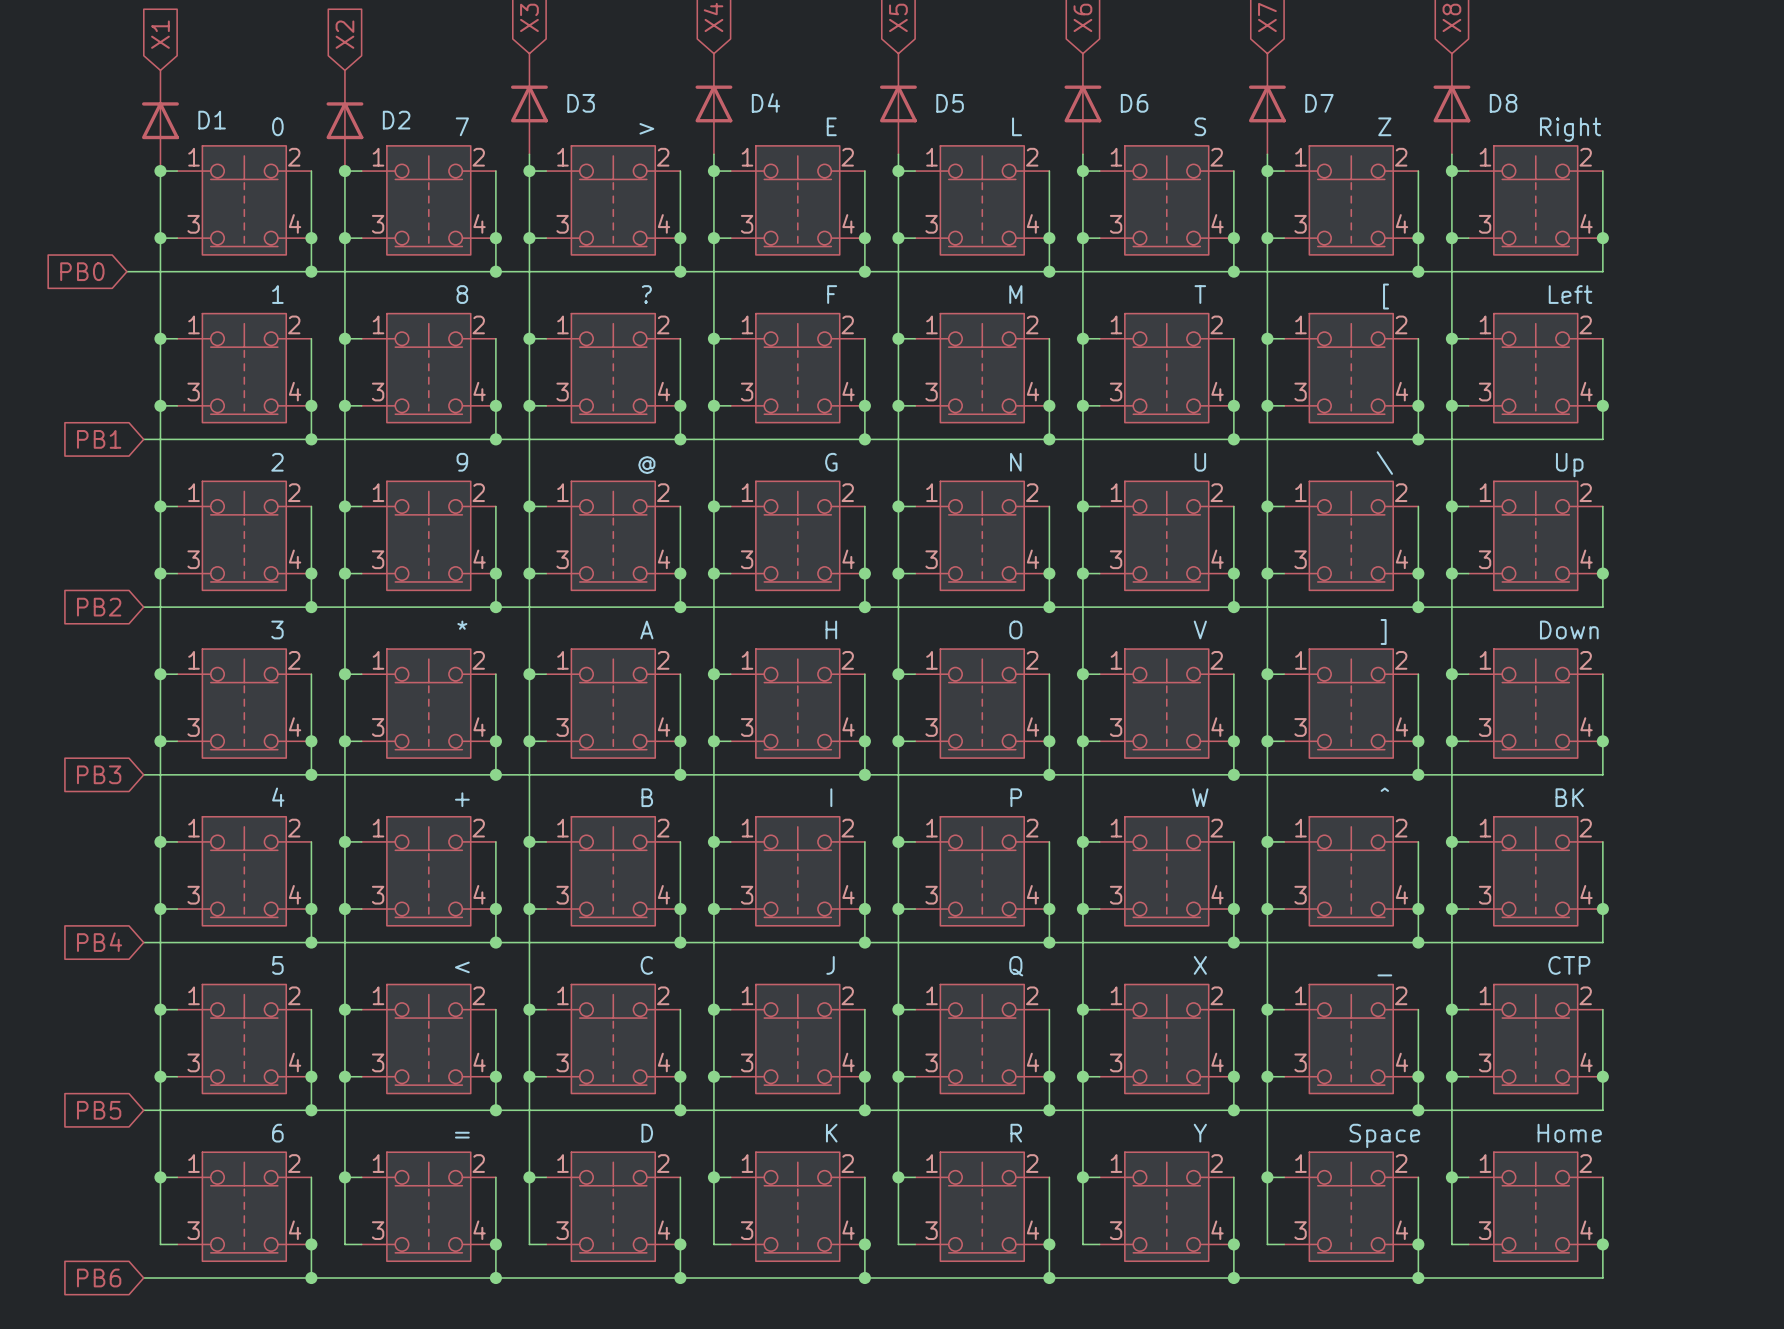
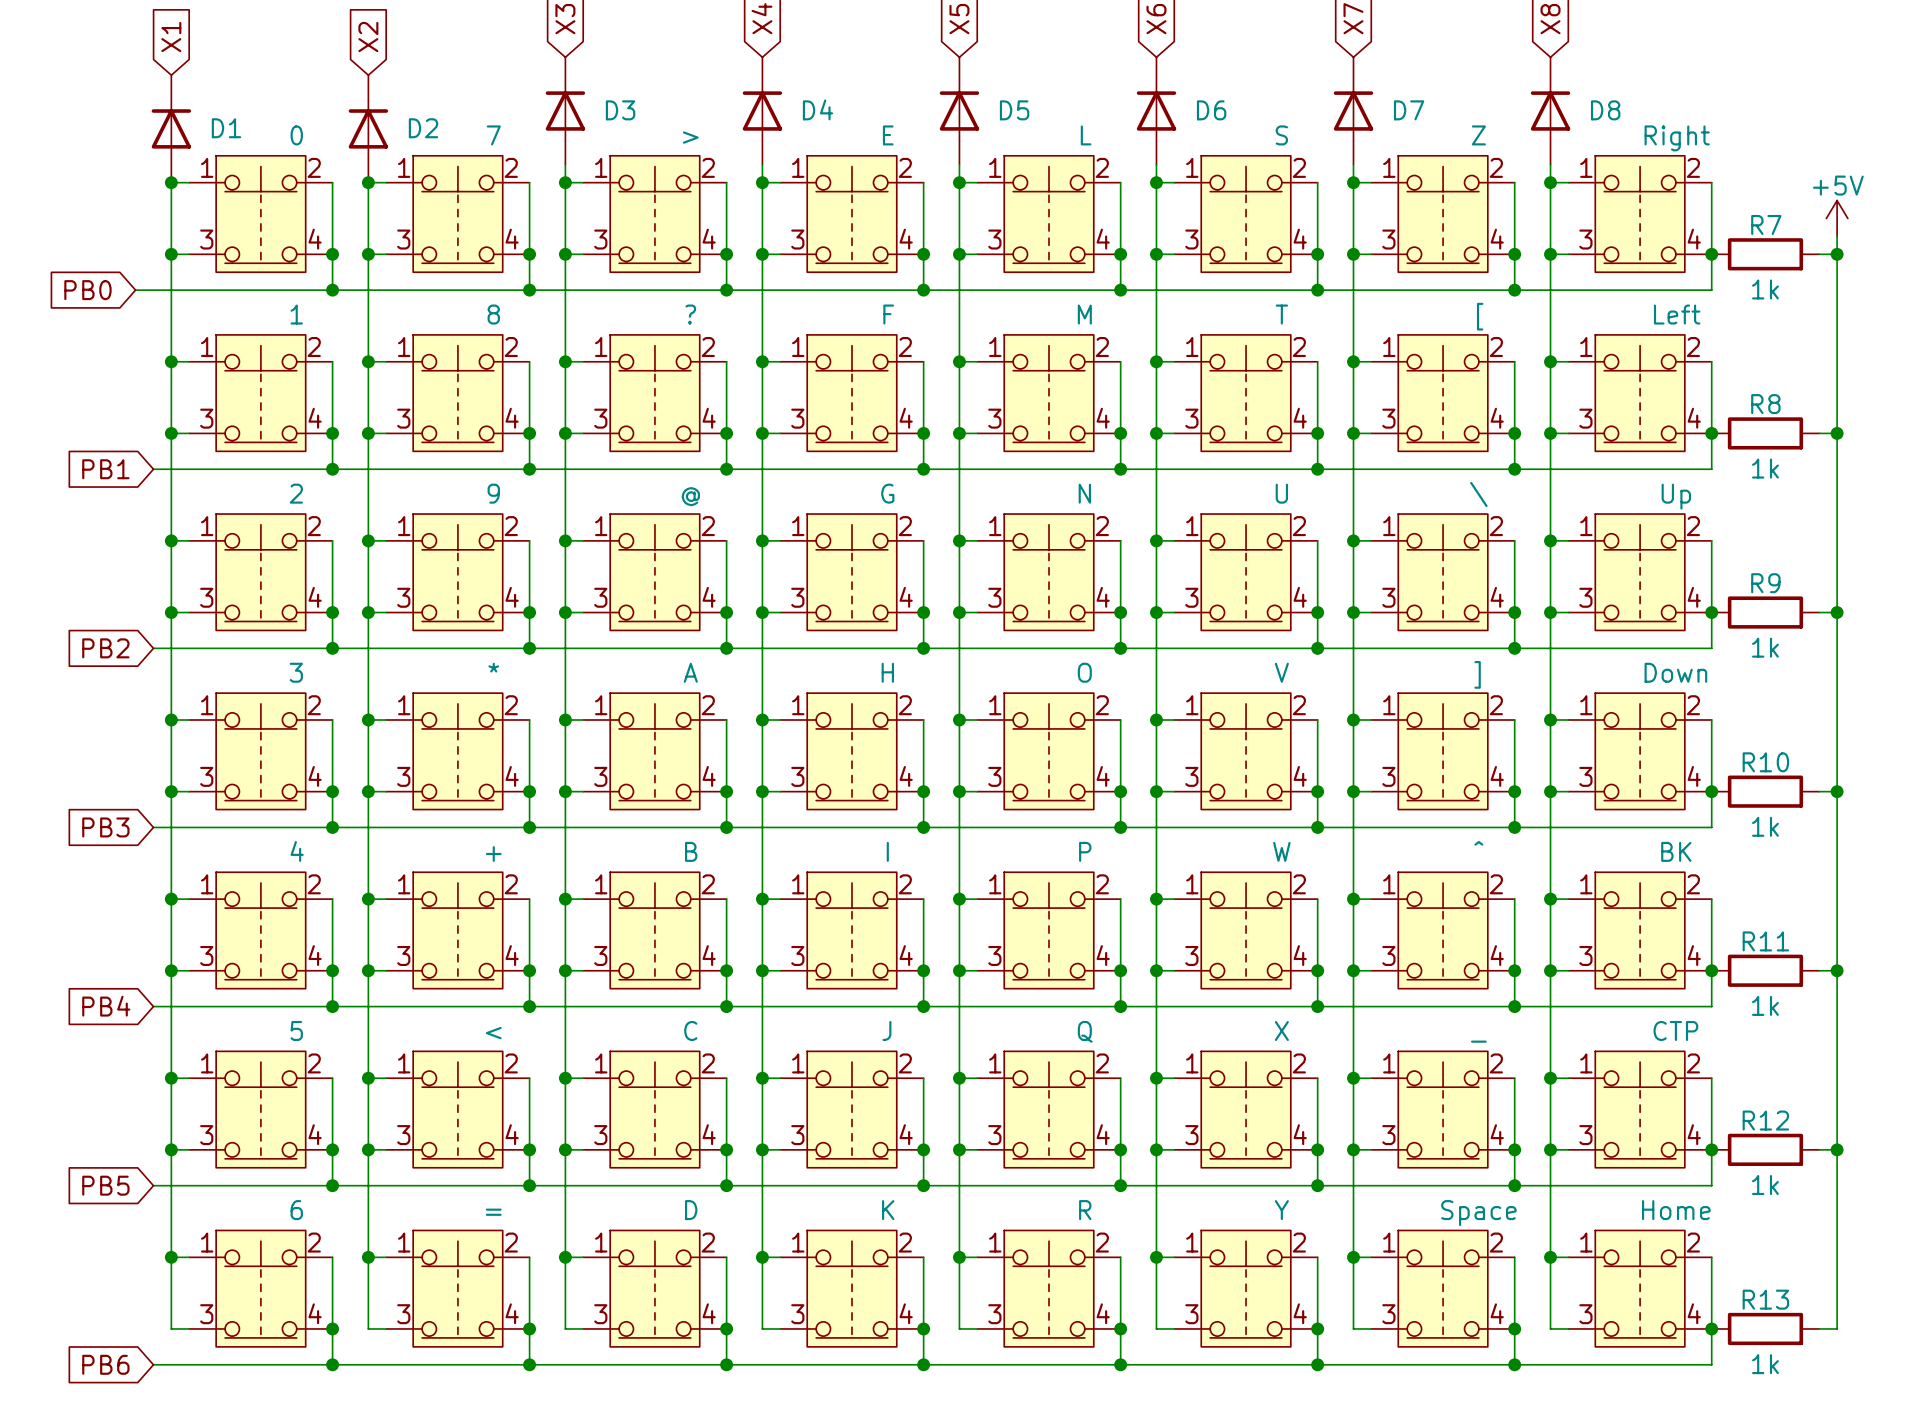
power symbol: none -> +5V (1837, 218)
wire: none -> (1837, 236) (1837, 1328) (1819, 1328)
R7: none -> 1k (1765, 254)
wire: none -> (1819, 254) (1837, 254)
junction: none -> (1837, 254)
R8: none -> 1k (1765, 433)
wire: none -> (1819, 433) (1837, 433)
junction: none -> (1837, 433)
R9: none -> 1k (1765, 612)
wire: none -> (1819, 612) (1837, 612)
junction: none -> (1837, 612)
R10: none -> 1k (1765, 791)
wire: none -> (1819, 791) (1837, 791)
junction: none -> (1837, 791)
R11: none -> 1k (1765, 970)
wire: none -> (1819, 970) (1837, 970)
junction: none -> (1837, 970)
R12: none -> 1k (1765, 1149)
wire: none -> (1819, 1149) (1837, 1149)
junction: none -> (1837, 1149)
R13: none -> 1k (1765, 1328)

